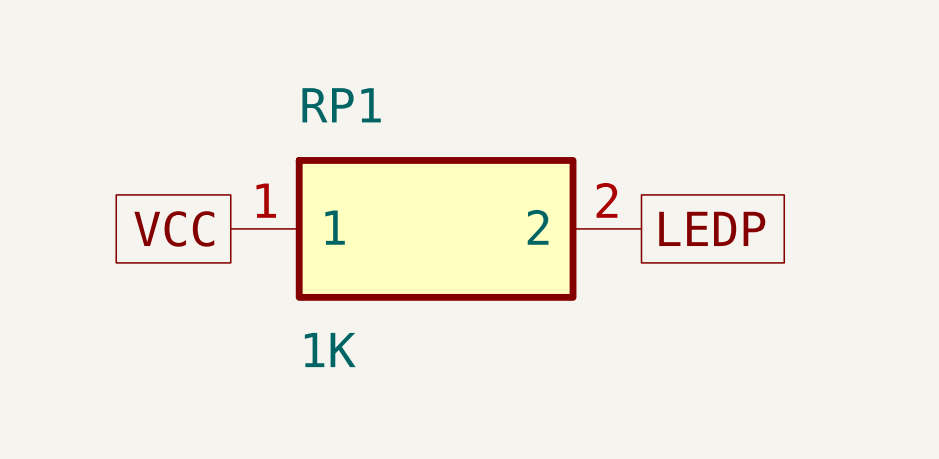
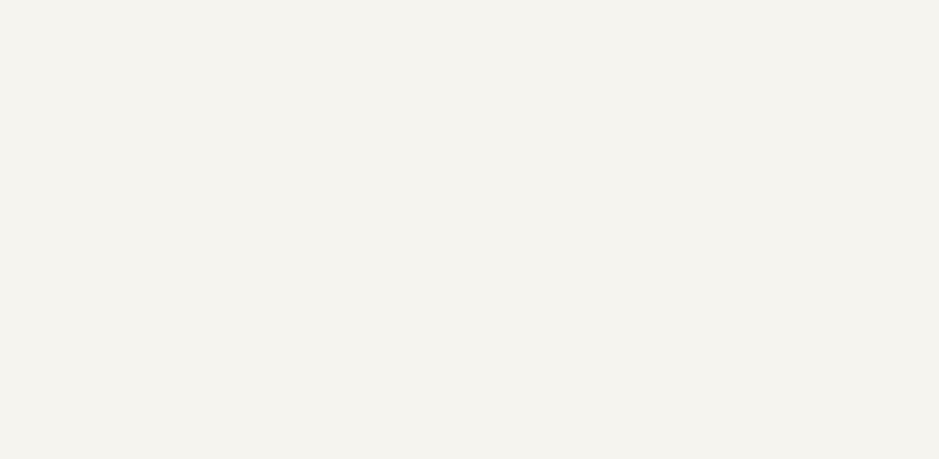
global label: VCC (174, 228) -> none
RP1: 1K (436, 228) -> none
global label: LEDP (712, 228) -> none

